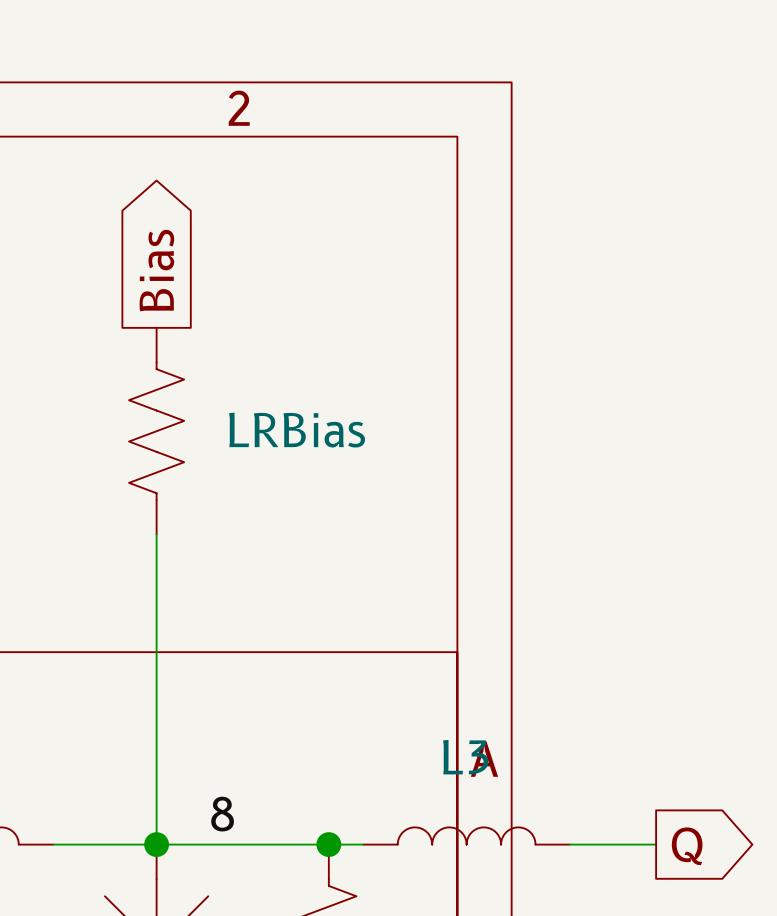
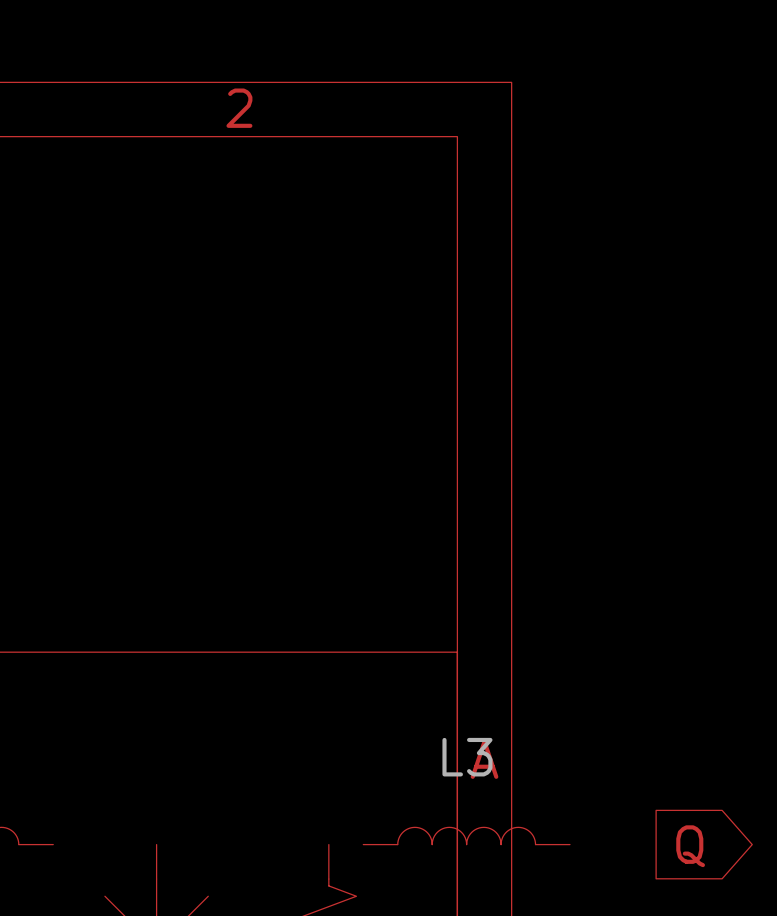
global label: Bias (156, 270) -> none
LRBias: (156, 431) -> none
wire: (156, 534) (156, 844) -> none
label: 8 (222, 814) -> none
wire: (53, 844) (363, 844) -> none
junction: (156, 844) -> none
junction: (328, 844) -> none
wire: (569, 844) (656, 844) -> none

